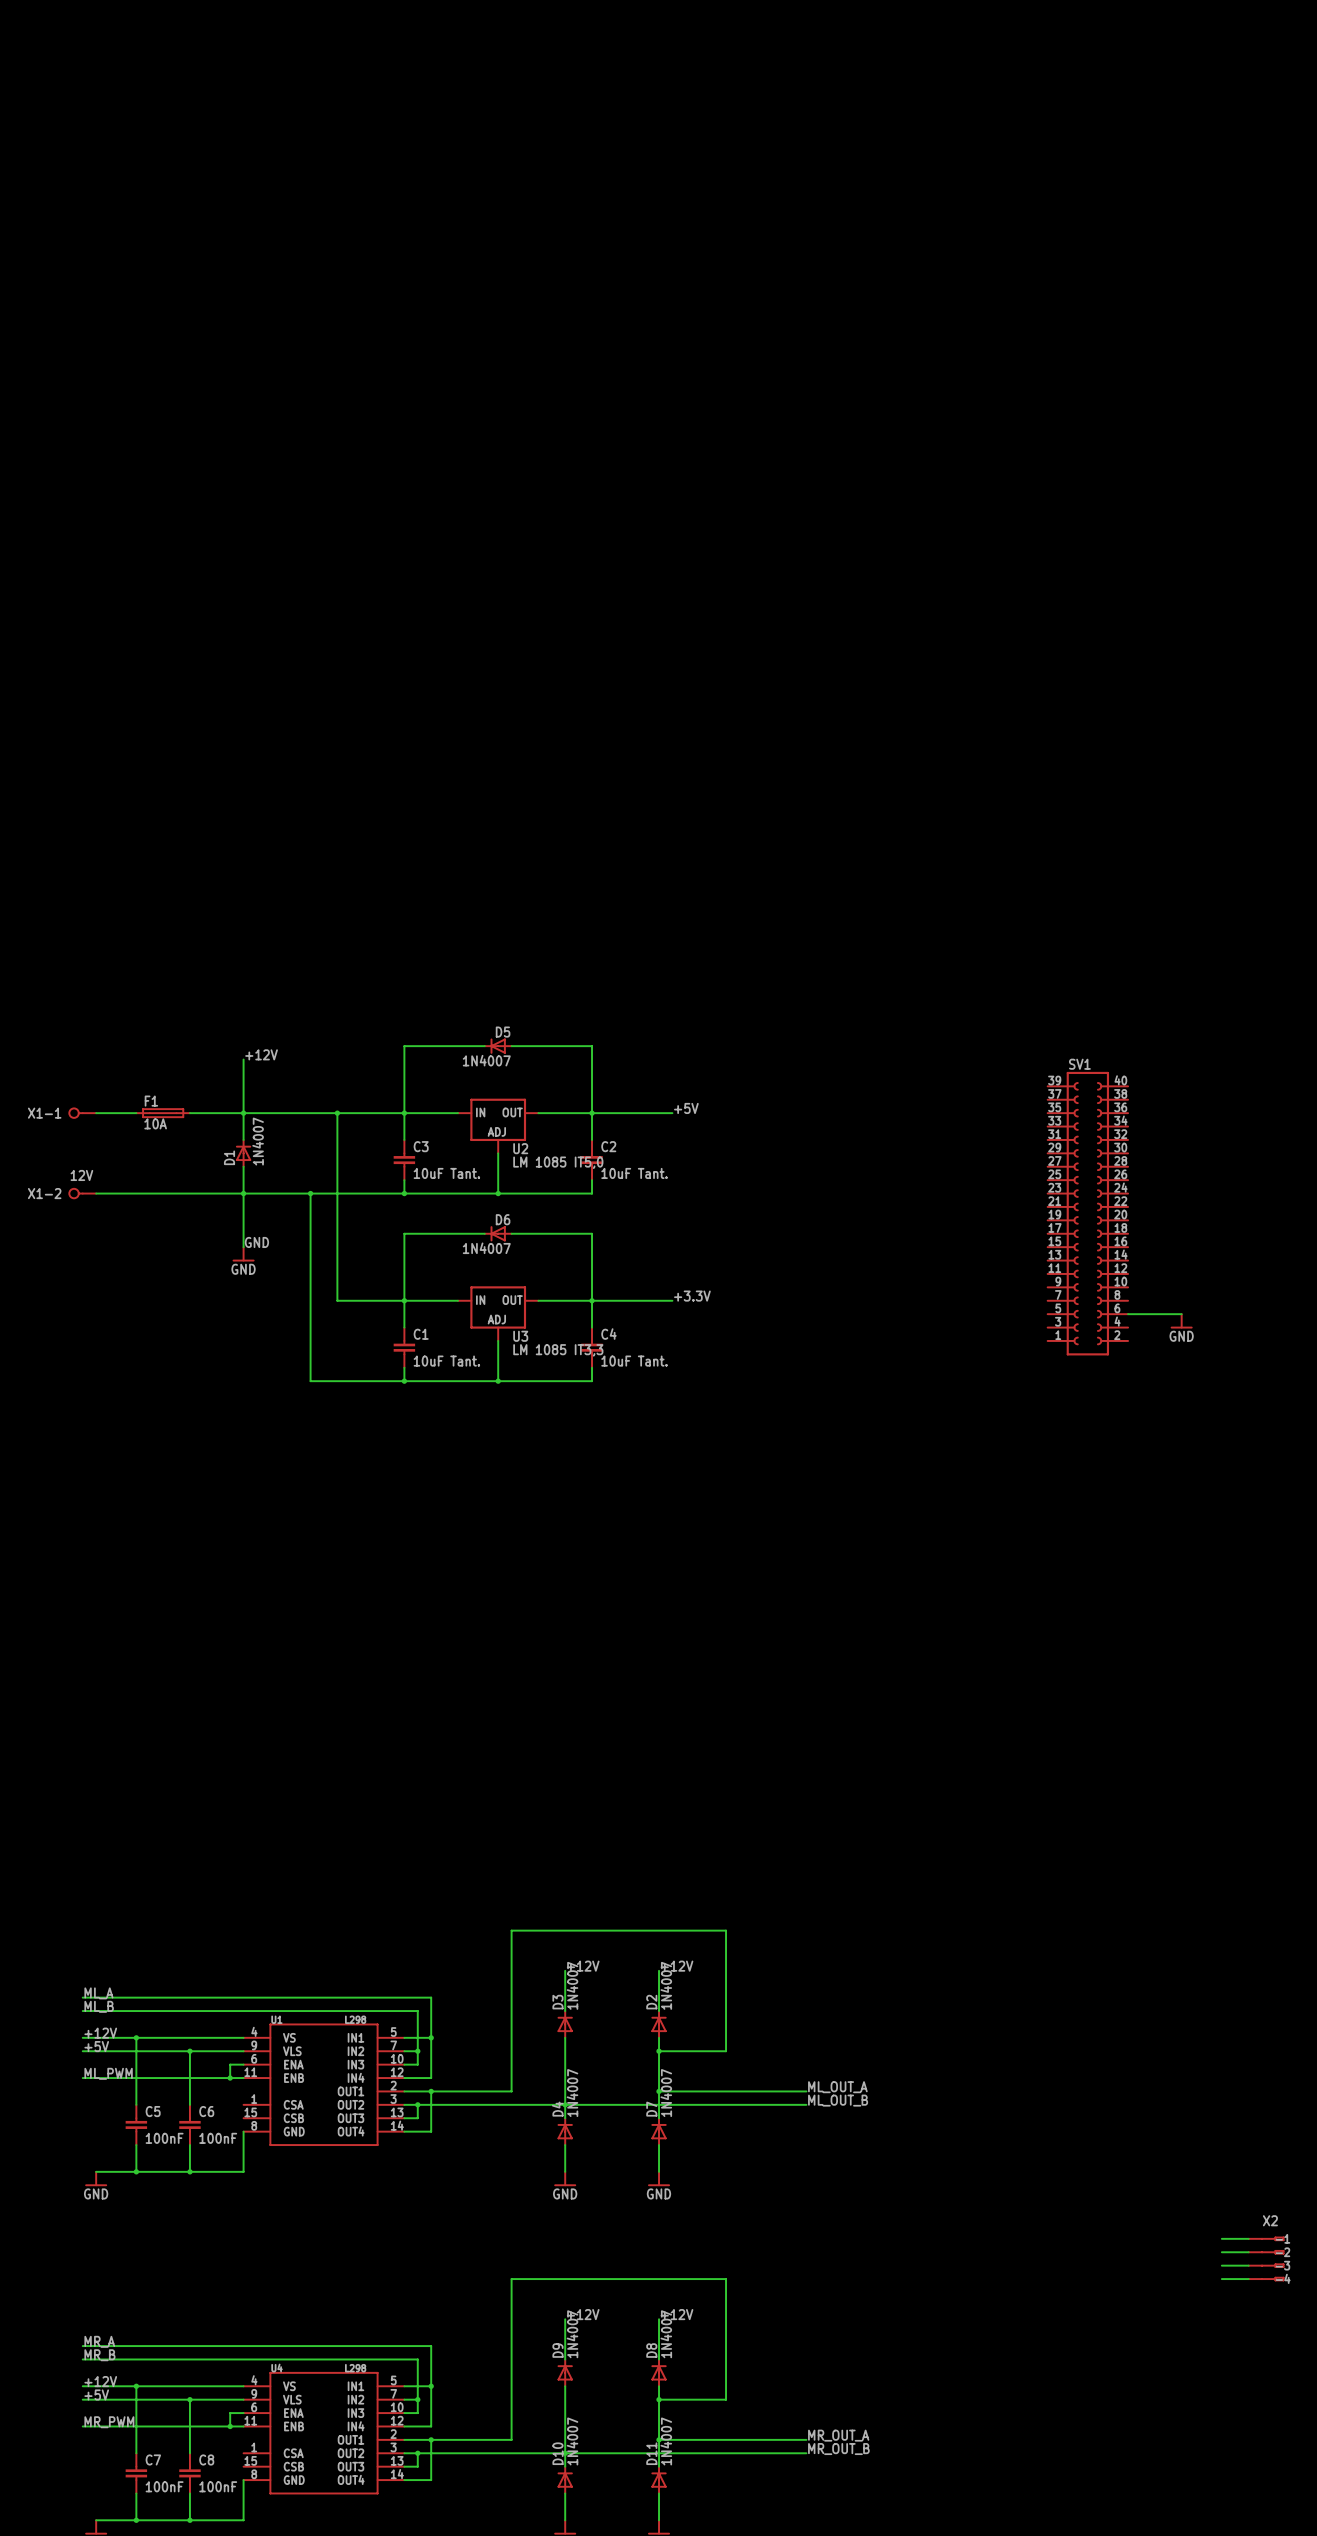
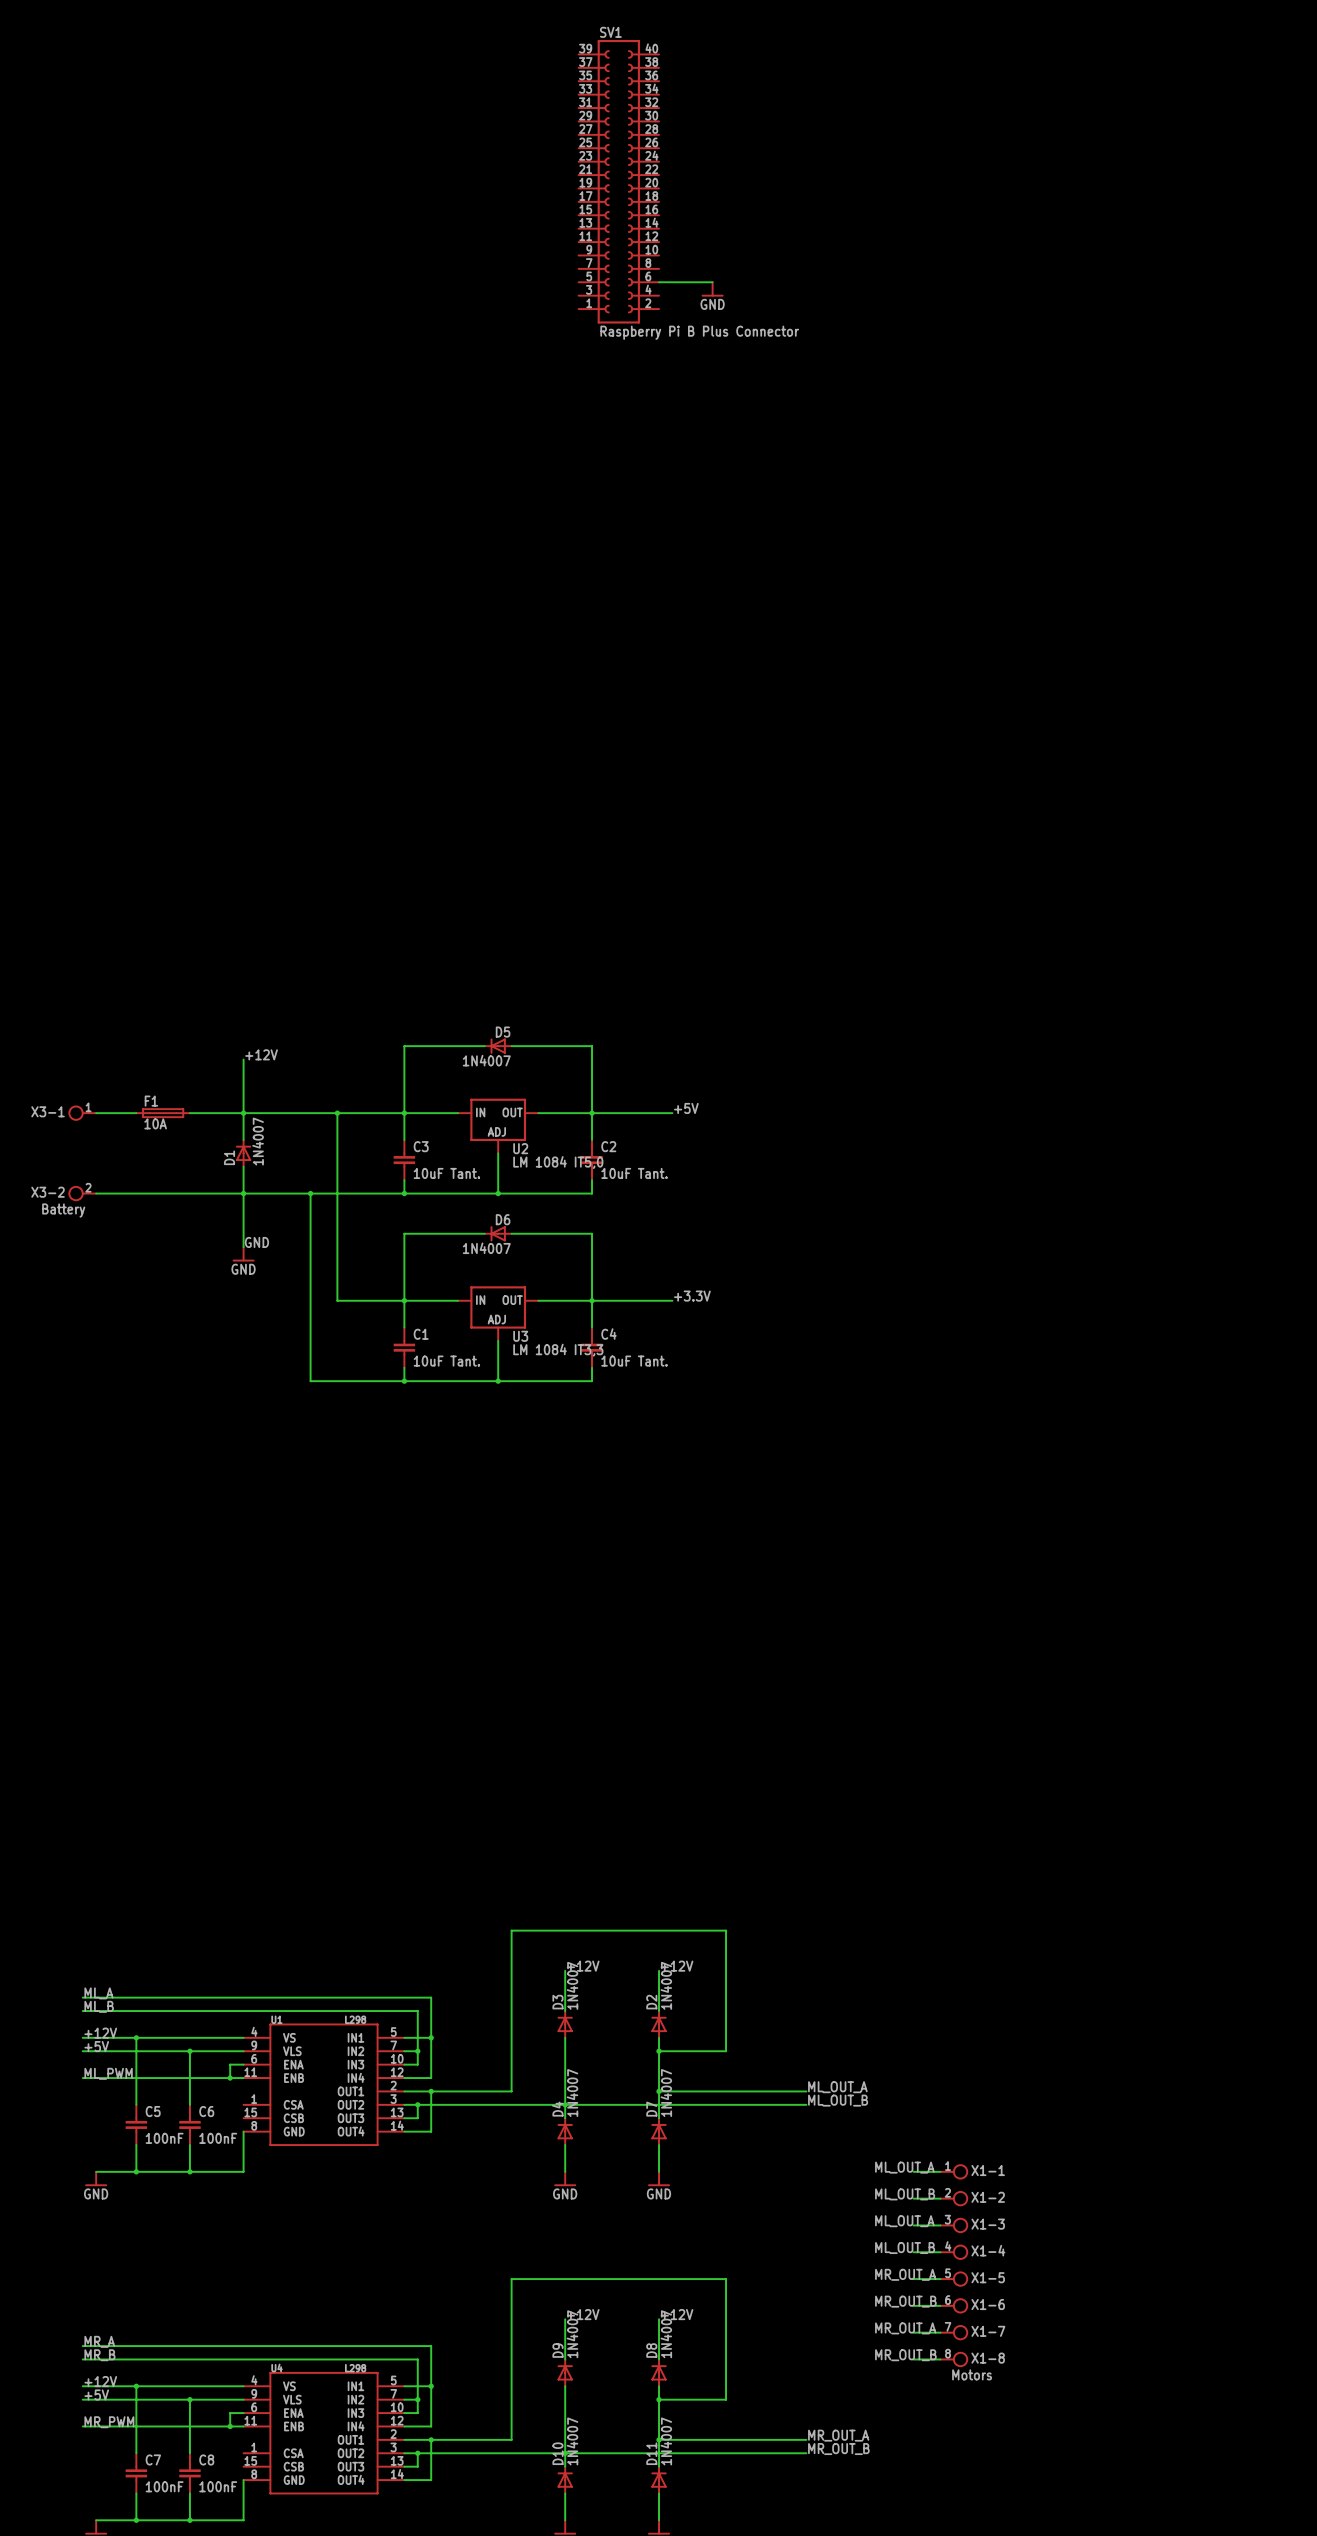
wire: none -> (659, 282) (712, 282)
power symbol: none -> GND (712, 289)
SV1 value: none -> Raspberry Pi B Plus Connector (699, 332)
X1-1 symbol: [68, 1107, 97, 1119] -> [940, 2164, 968, 2180]
X1-1 name position: X1-1 (44, 1113) -> X1-1 (988, 2170)
X3-1: none -> (82, 1113)
U2 value: LM 1085 IT5,0 (558, 1162) -> LM 1084 IT5,0 (558, 1162)
X1-2 value: 12V (81, 1175) -> none
X1-2 symbol: [68, 1188, 97, 1199] -> [940, 2191, 968, 2207]
X1-2 name position: X1-2 (44, 1193) -> X1-2 (988, 2197)
X3-2: none -> Battery (82, 1193)
SV1 position: (1087, 1213) -> (618, 181)
wire: (1128, 1314) (1181, 1314) -> none
power symbol: GND (1181, 1321) -> none
U3 value: LM 1085 IT3,3 (558, 1350) -> LM 1084 IT3,3 (558, 1350)
label: none -> ML_OUT_A (904, 2167)
wire: none -> (913, 2171) (940, 2171)
label: none -> ML_OUT_B (905, 2194)
wire: none -> (913, 2198) (940, 2198)
label: none -> ML_OUT_A (904, 2221)
wire: none -> (913, 2225) (940, 2225)
X1-3: none -> (954, 2225)
wire: (1221, 2238) (1248, 2238) -> none
label: none -> ML_OUT_B (905, 2248)
wire: none -> (913, 2252) (940, 2252)
X1-4: none -> (954, 2252)
wire: (1221, 2252) (1248, 2252) -> none
X2: (1266, 2258) -> none
wire: (1221, 2265) (1248, 2265) -> none
label: none -> MR_OUT_A (905, 2274)
wire: none -> (913, 2279) (940, 2279)
X1-5: none -> (954, 2279)
wire: (1221, 2279) (1248, 2279) -> none
label: none -> MR_OUT_B (905, 2301)
wire: none -> (913, 2305) (940, 2305)
X1-6: none -> (954, 2305)
label: none -> MR_OUT_A (905, 2328)
wire: none -> (913, 2332) (940, 2332)
X1-7: none -> (954, 2332)
label: none -> MR_OUT_B (905, 2355)
wire: none -> (913, 2359) (940, 2359)
X1-8: none -> Motors (954, 2359)

